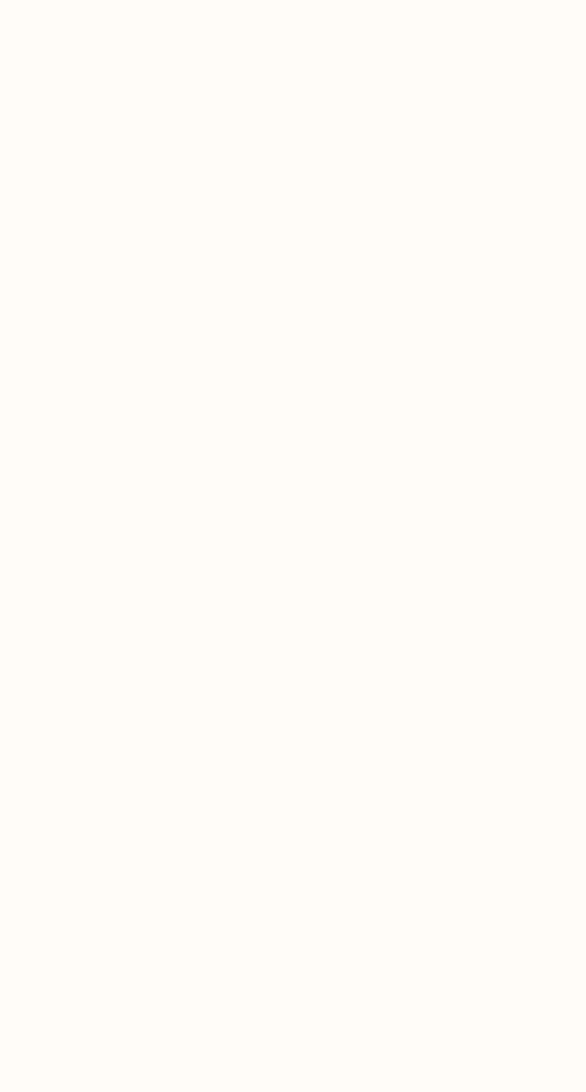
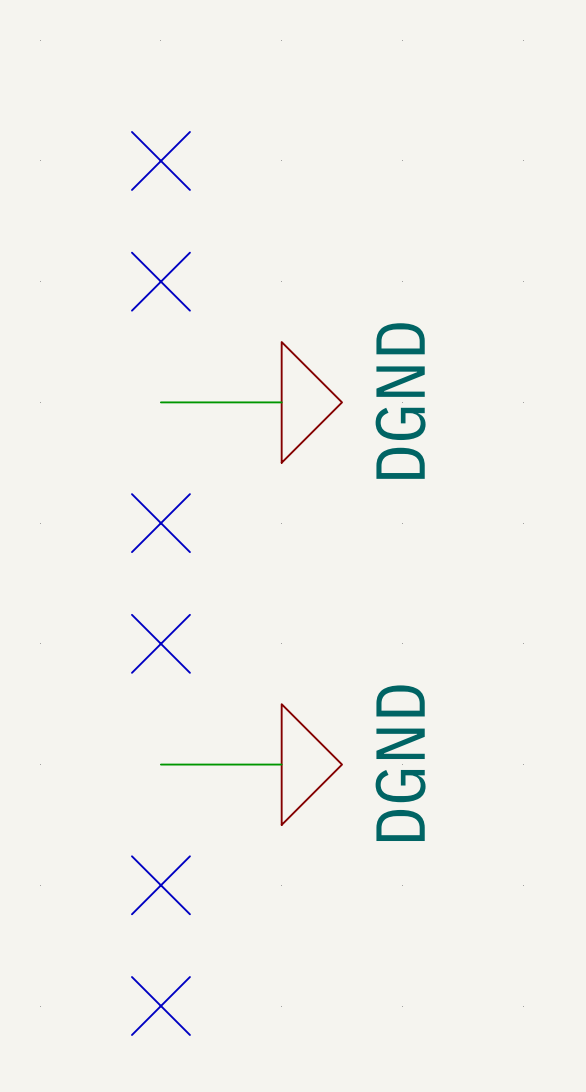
no-connect mark: none -> (160, 160)
no-connect mark: none -> (160, 281)
wire: none -> (160, 402) (281, 402)
power symbol: none -> DGND (311, 402)
no-connect mark: none -> (160, 523)
no-connect mark: none -> (160, 643)
wire: none -> (160, 764) (281, 764)
power symbol: none -> DGND (311, 764)
no-connect mark: none -> (160, 885)
no-connect mark: none -> (160, 1006)

